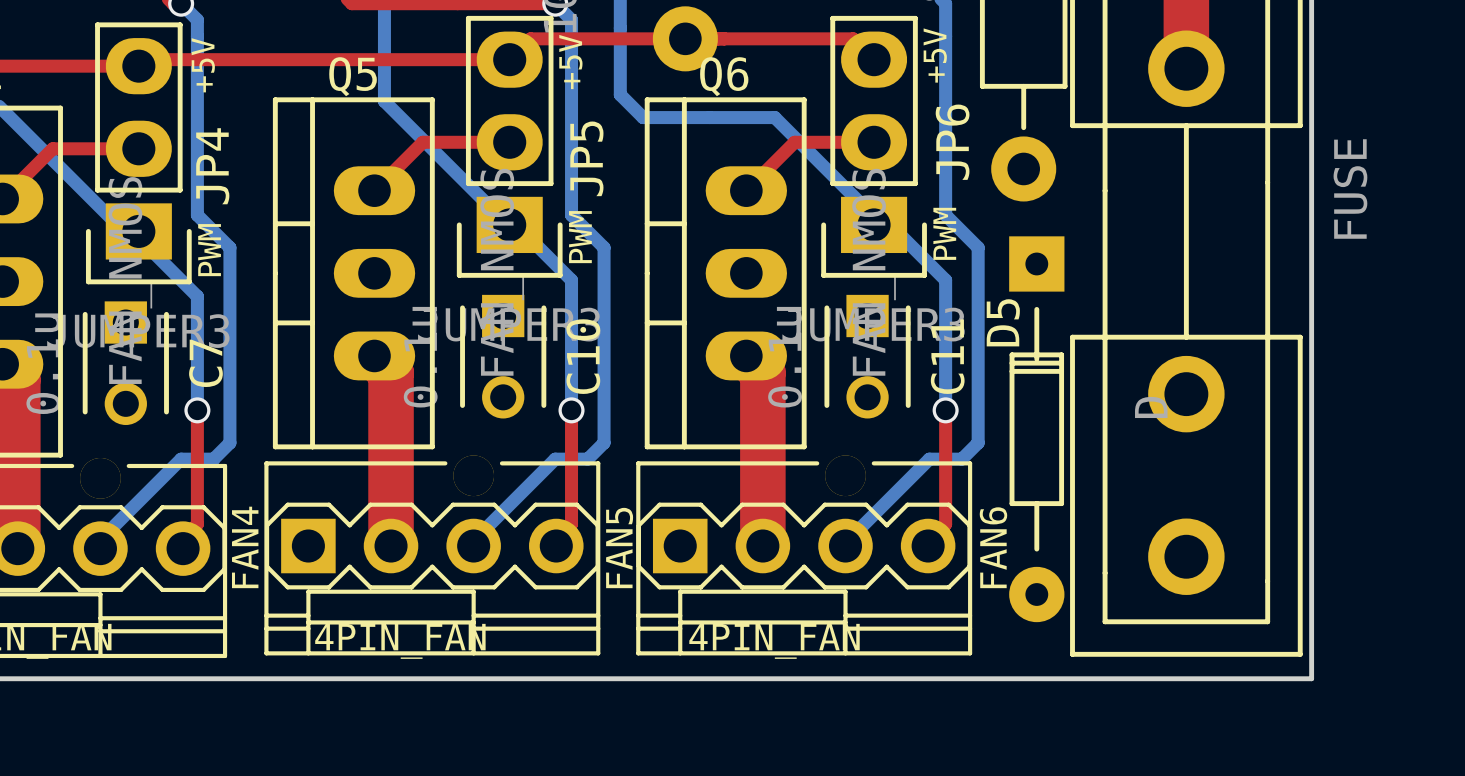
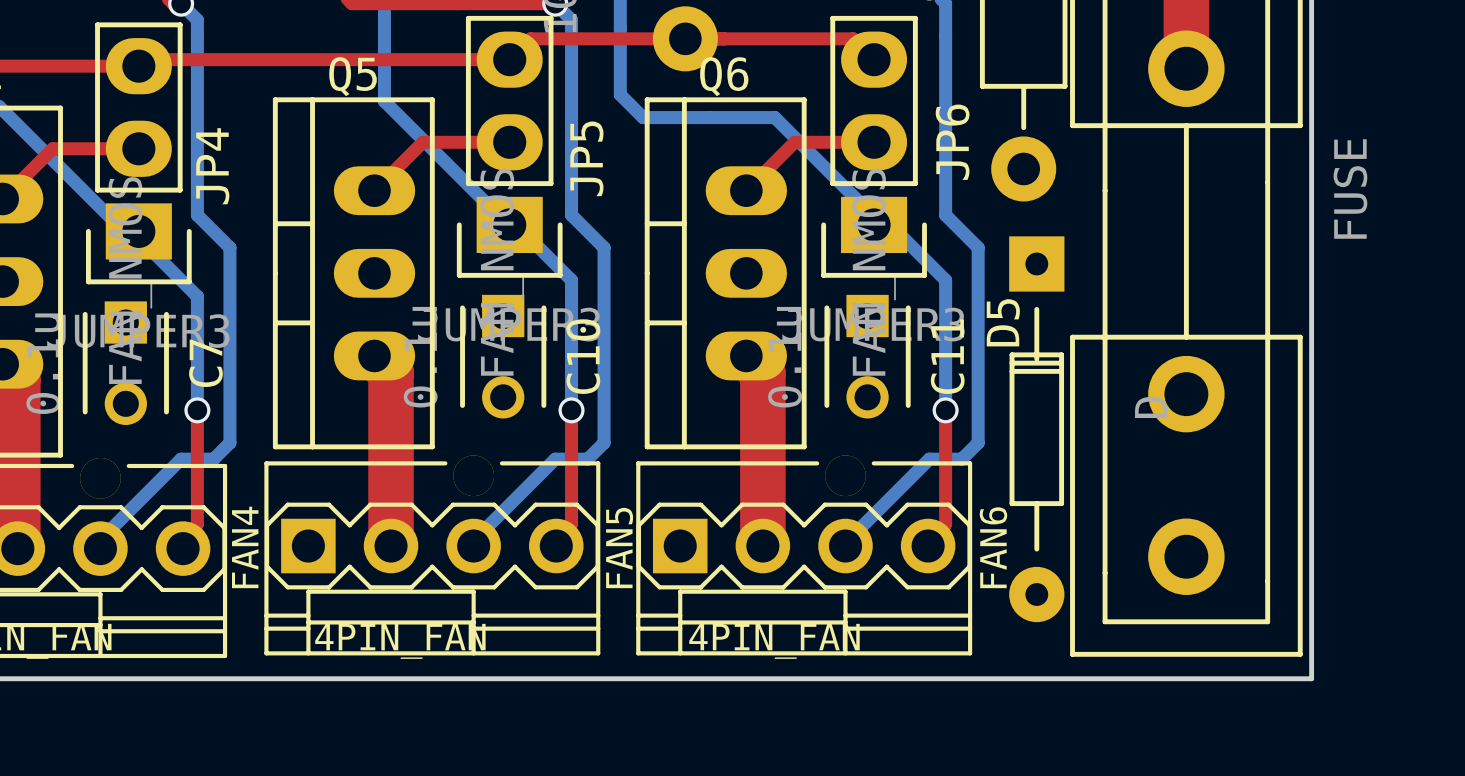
text: +5V (935, 55) -> none
text: +5V (570, 62) -> none
text: +5V (203, 65) -> none
text: PWM (944, 233) -> none
text: PWM (580, 237) -> none
text: PWM (209, 250) -> none

